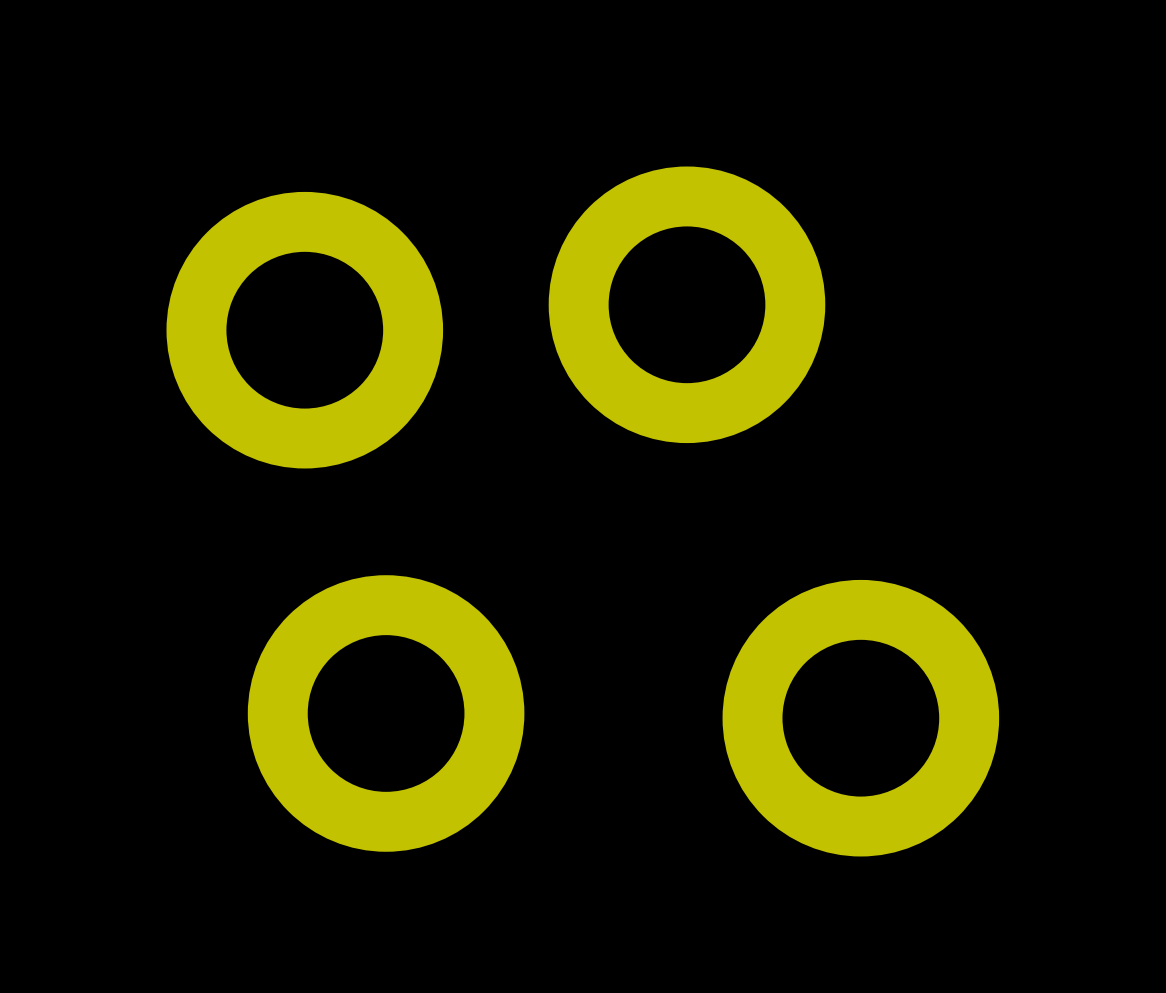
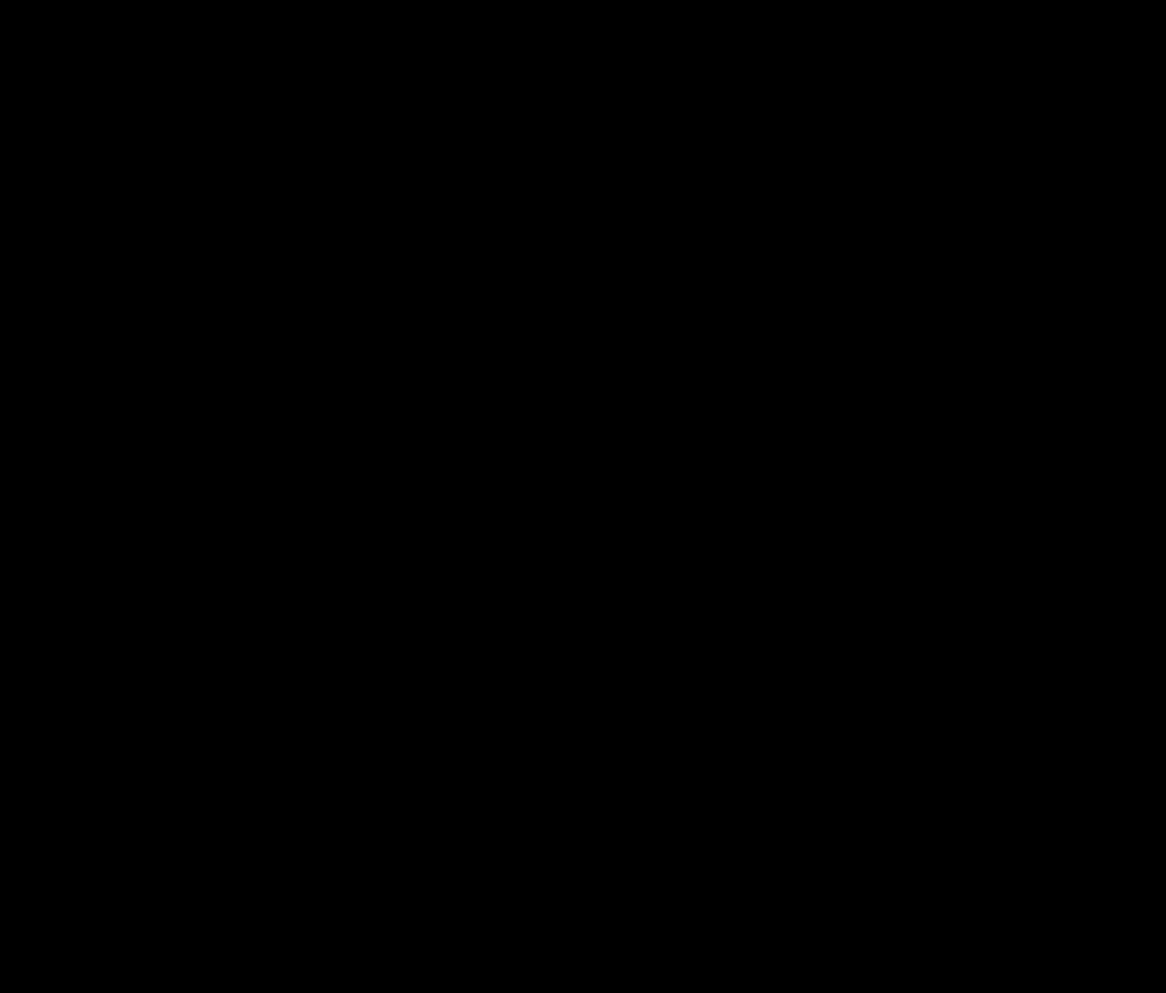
part: (686, 304) -> none
part: (304, 330) -> none
part: (386, 713) -> none
part: (860, 718) -> none

